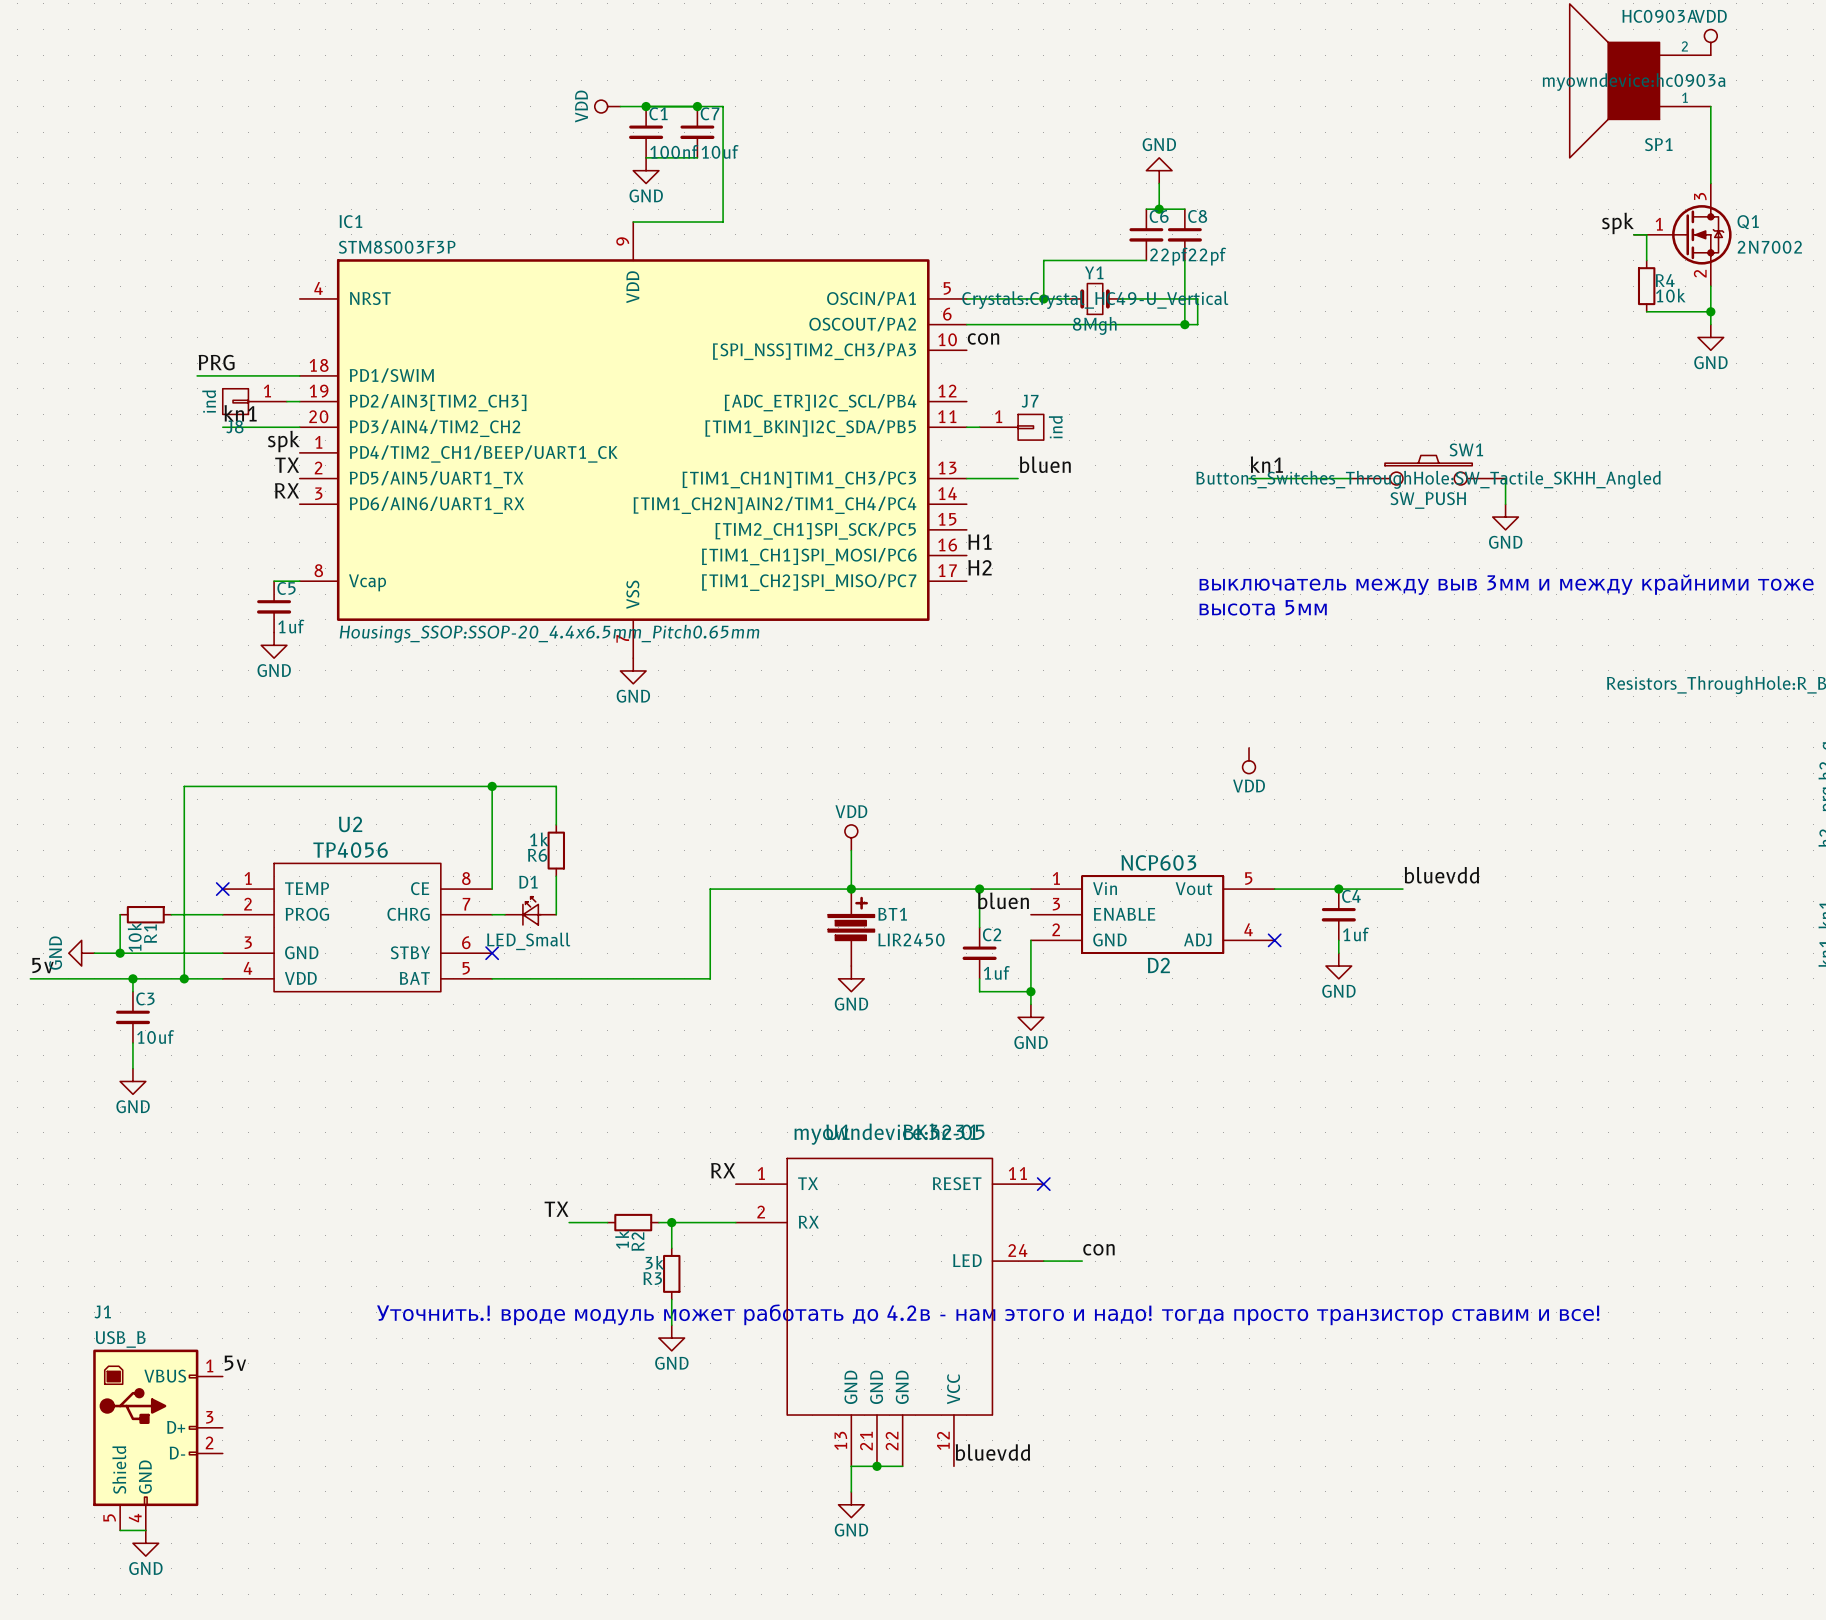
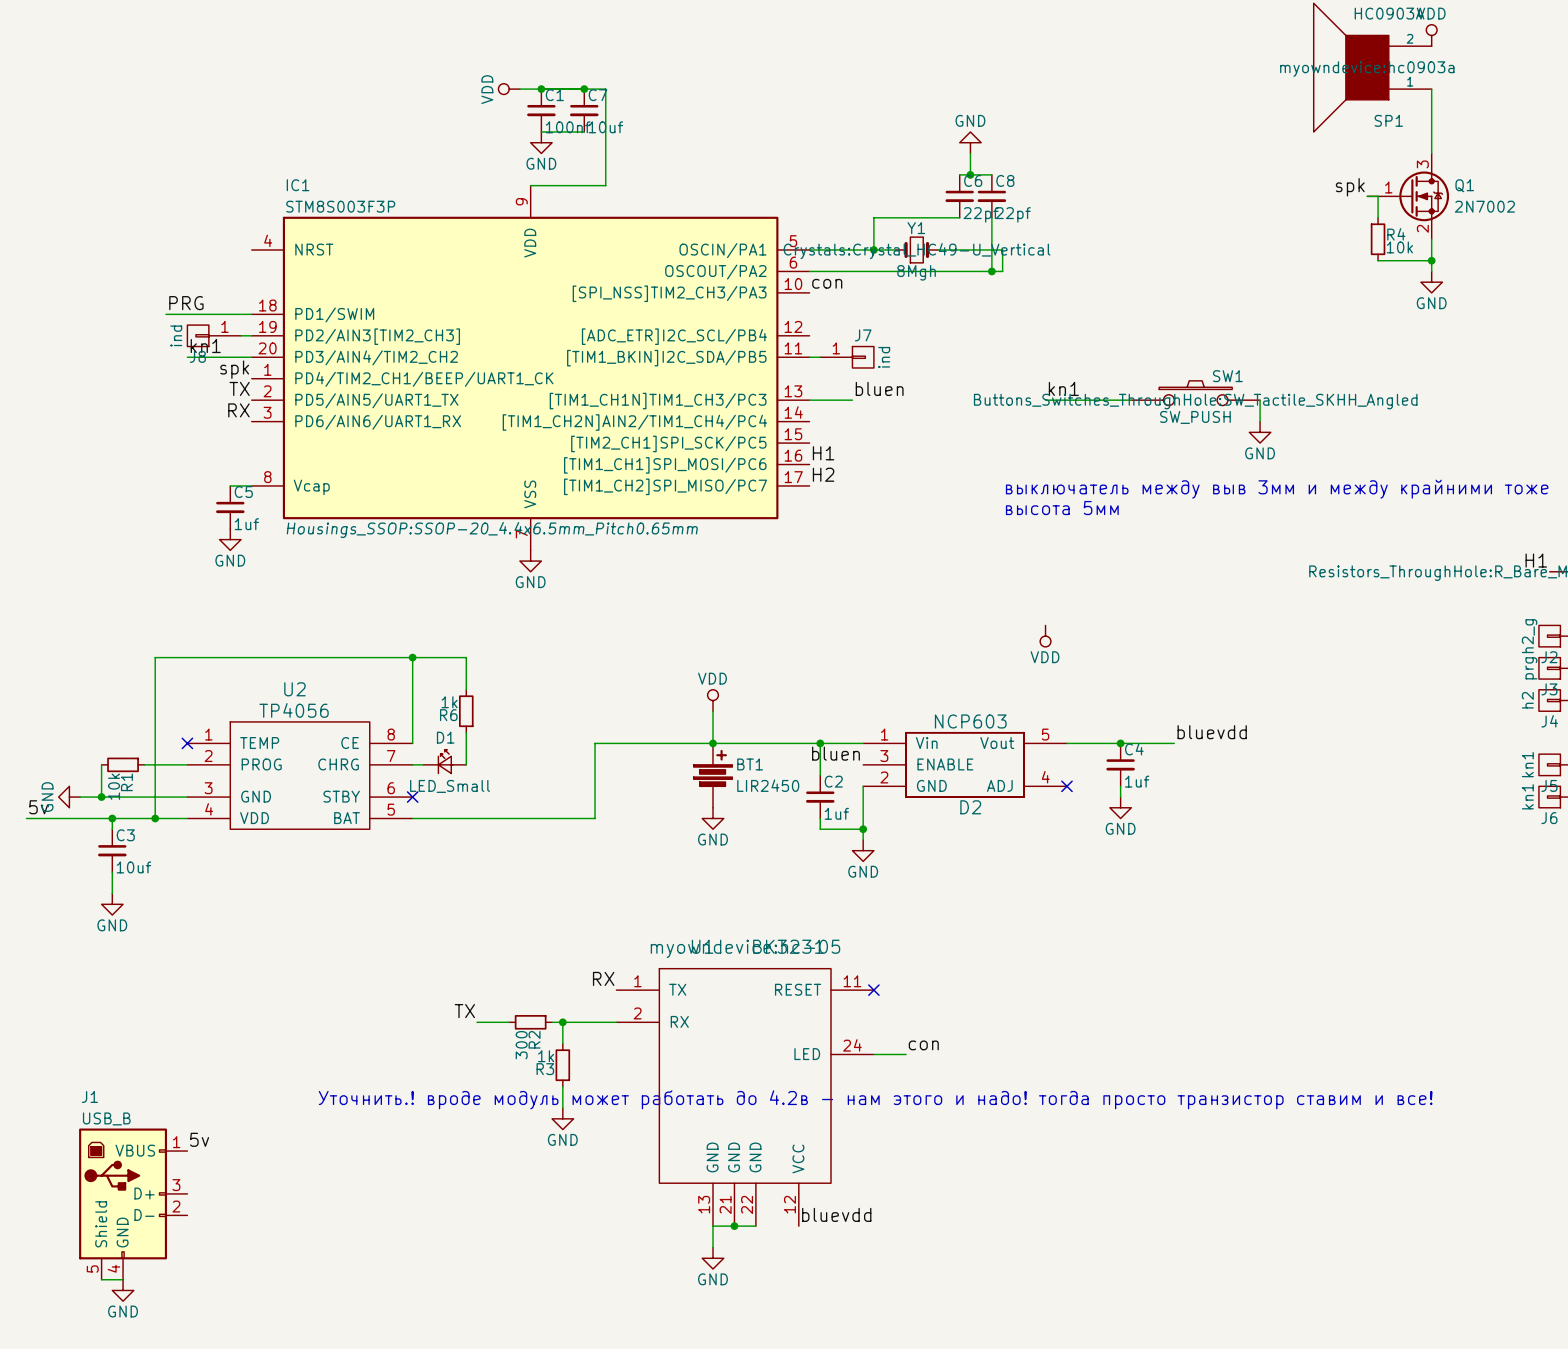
R2 value: 1k (622, 1239) -> 300 (521, 1045)
R3 value: 3k (654, 1262) -> 1k (546, 1056)

